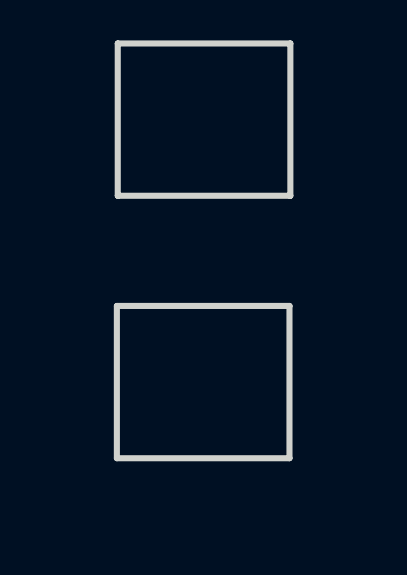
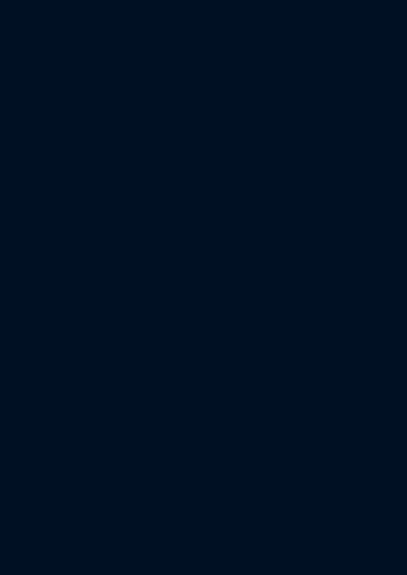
part: (204, 119) -> none
part: (203, 382) -> none

